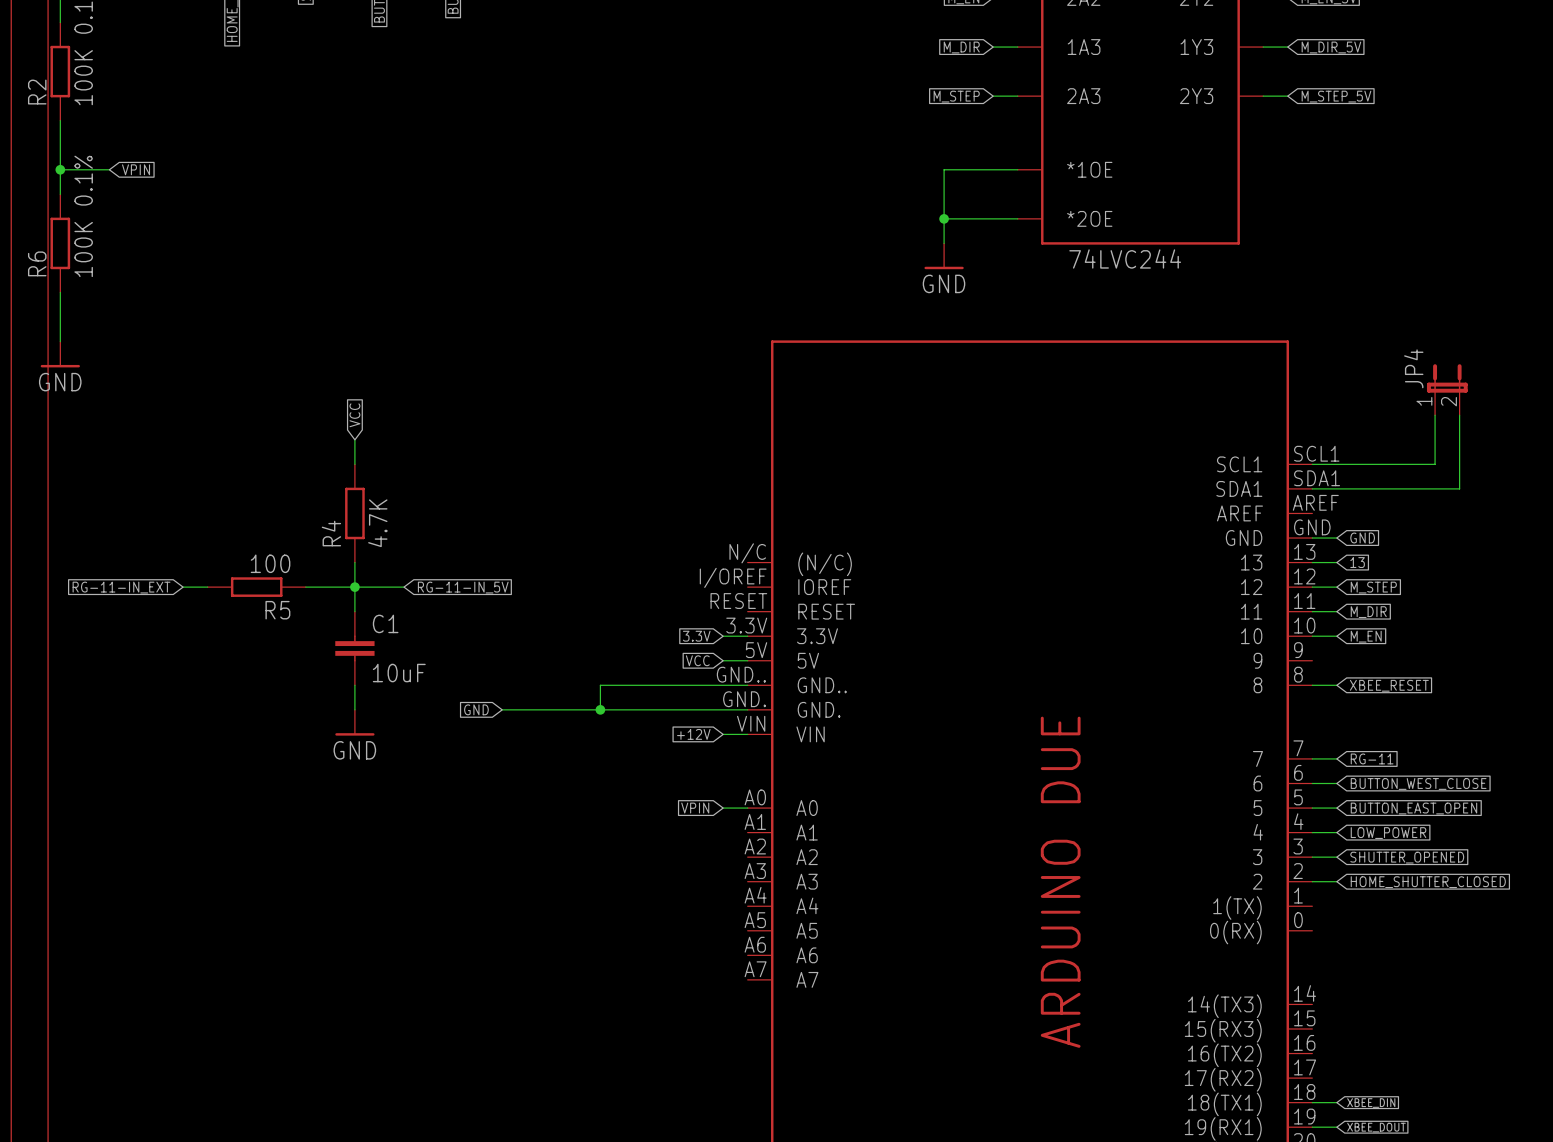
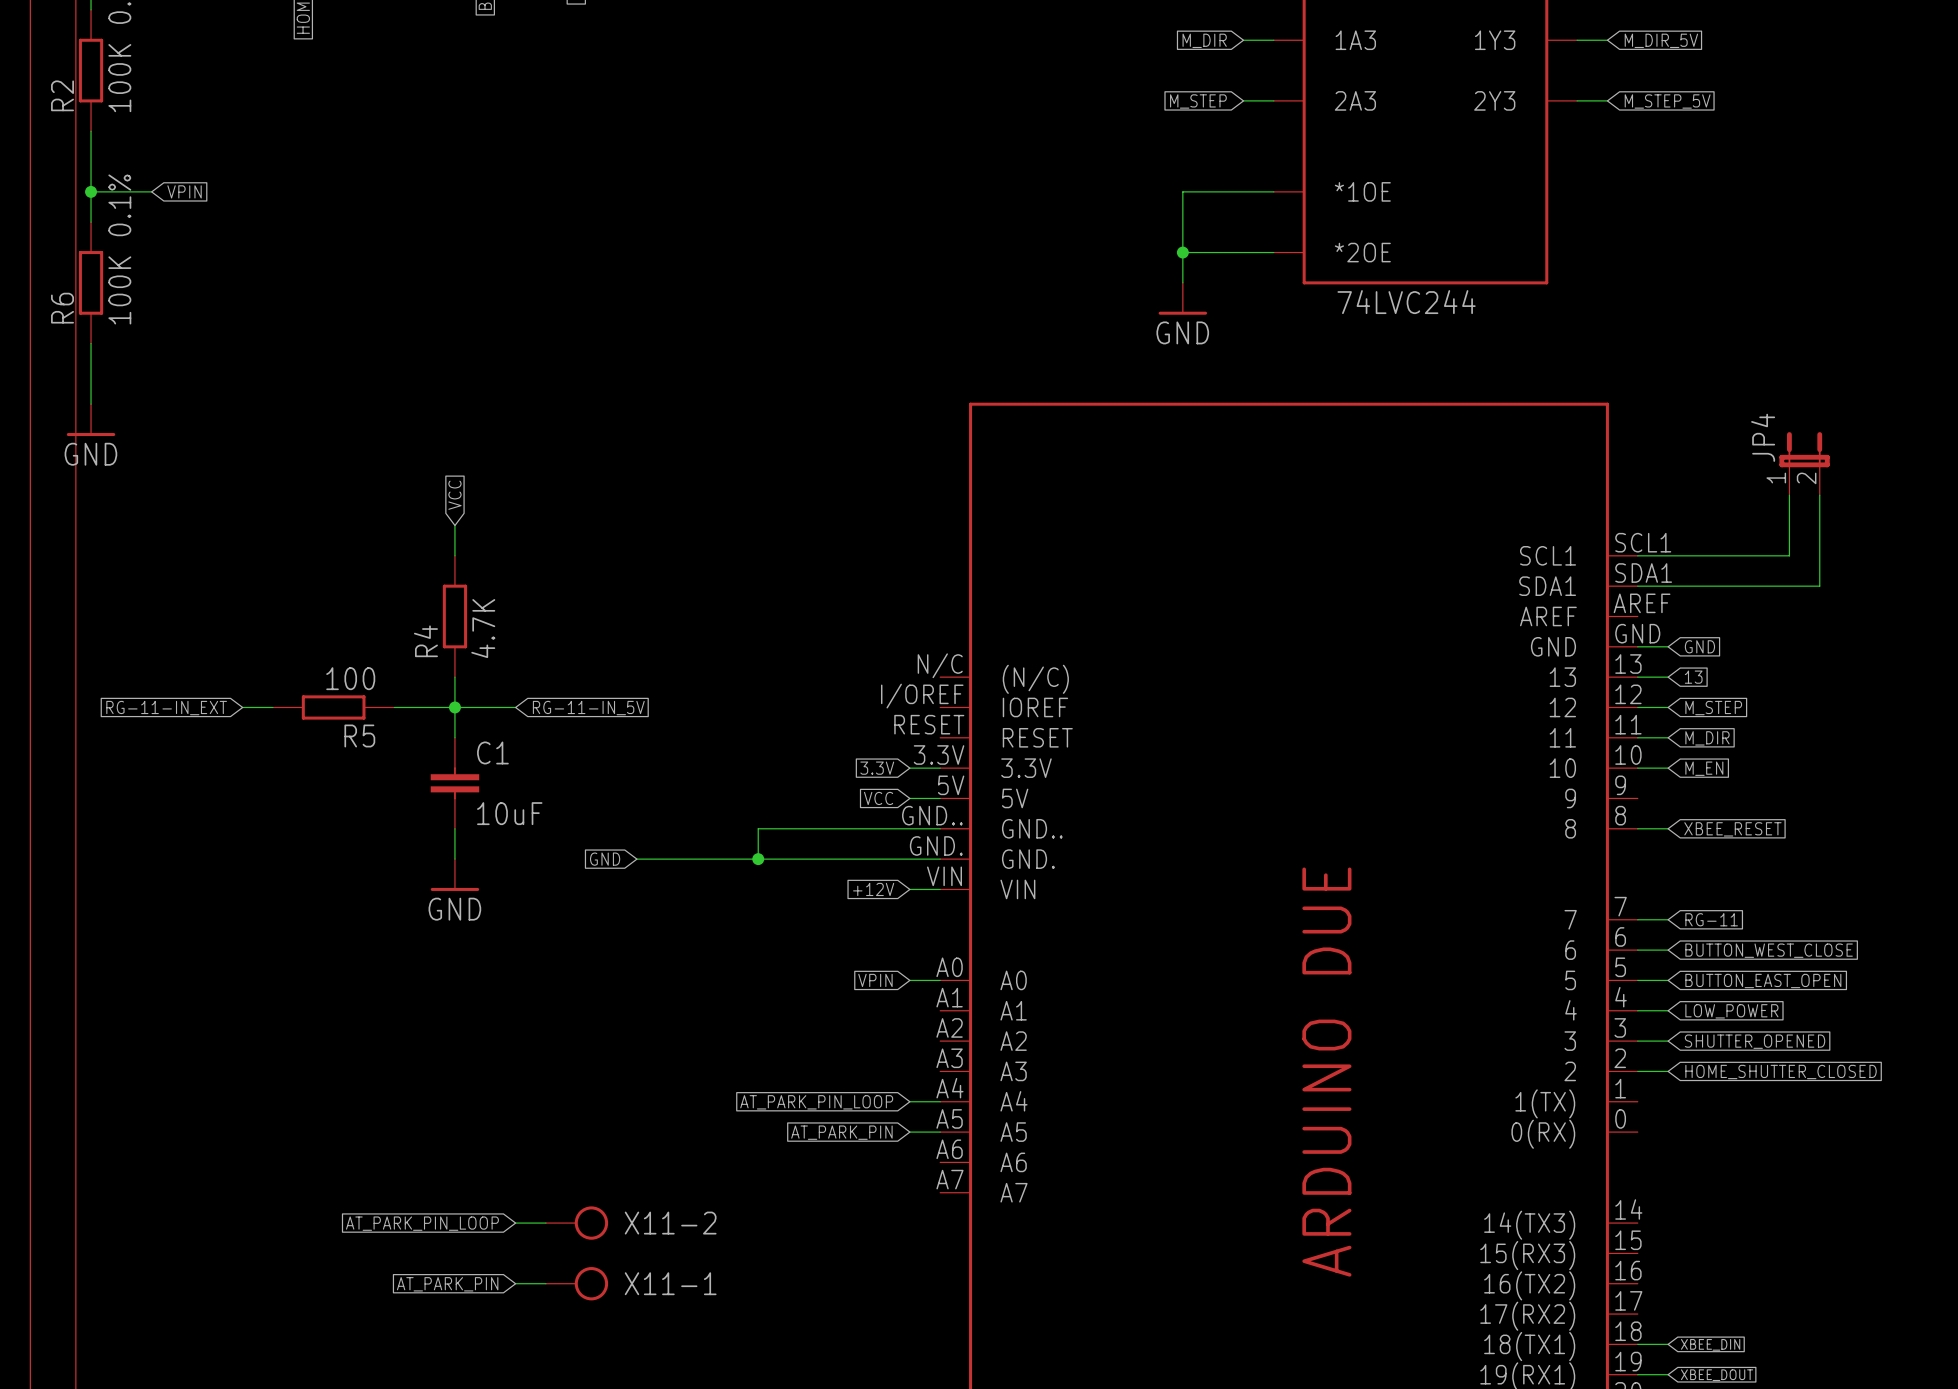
global label: none -> AT_PARK_PIN_LOOP (816, 1102)
wire: none -> (909, 1101) (940, 1101)
wire: none -> (909, 1132) (940, 1132)
global label: none -> AT_PARK_PIN (841, 1132)
global label: none -> AT_PARK_PIN_LOOP (422, 1223)
wire: none -> (515, 1223) (545, 1223)
X11-2: none -> (577, 1223)
wire: none -> (515, 1283) (545, 1283)
X11-1: none -> (577, 1283)
global label: none -> AT_PARK_PIN (447, 1284)

